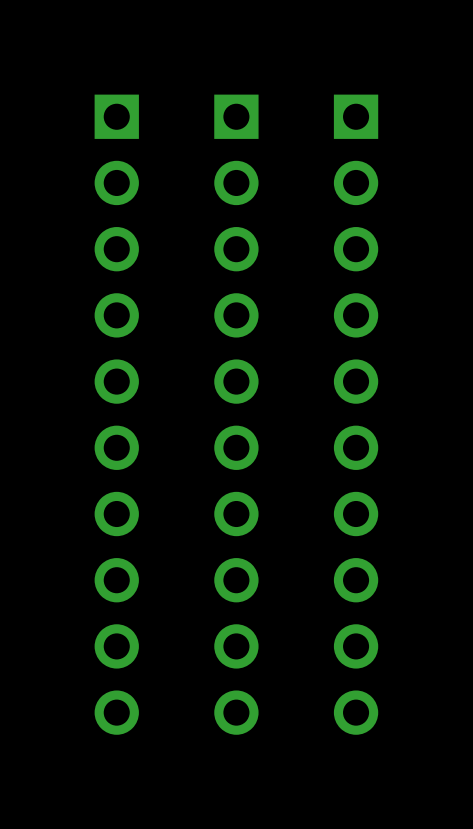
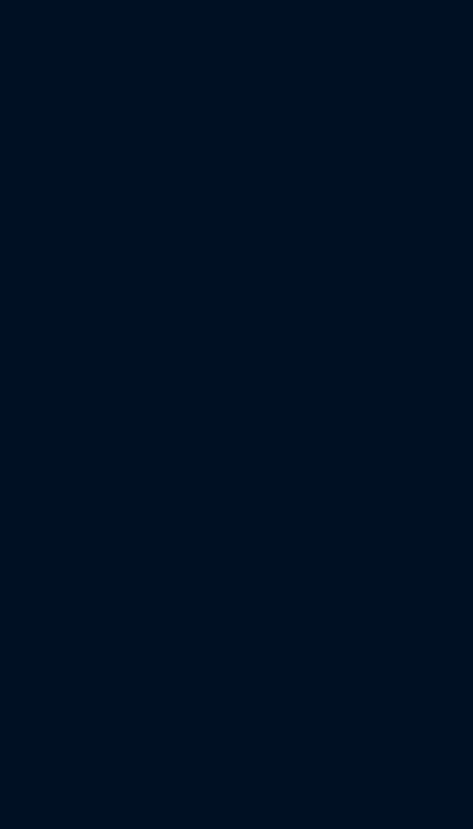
part: (116, 414) -> none
part: (236, 414) -> none
part: (356, 414) -> none

